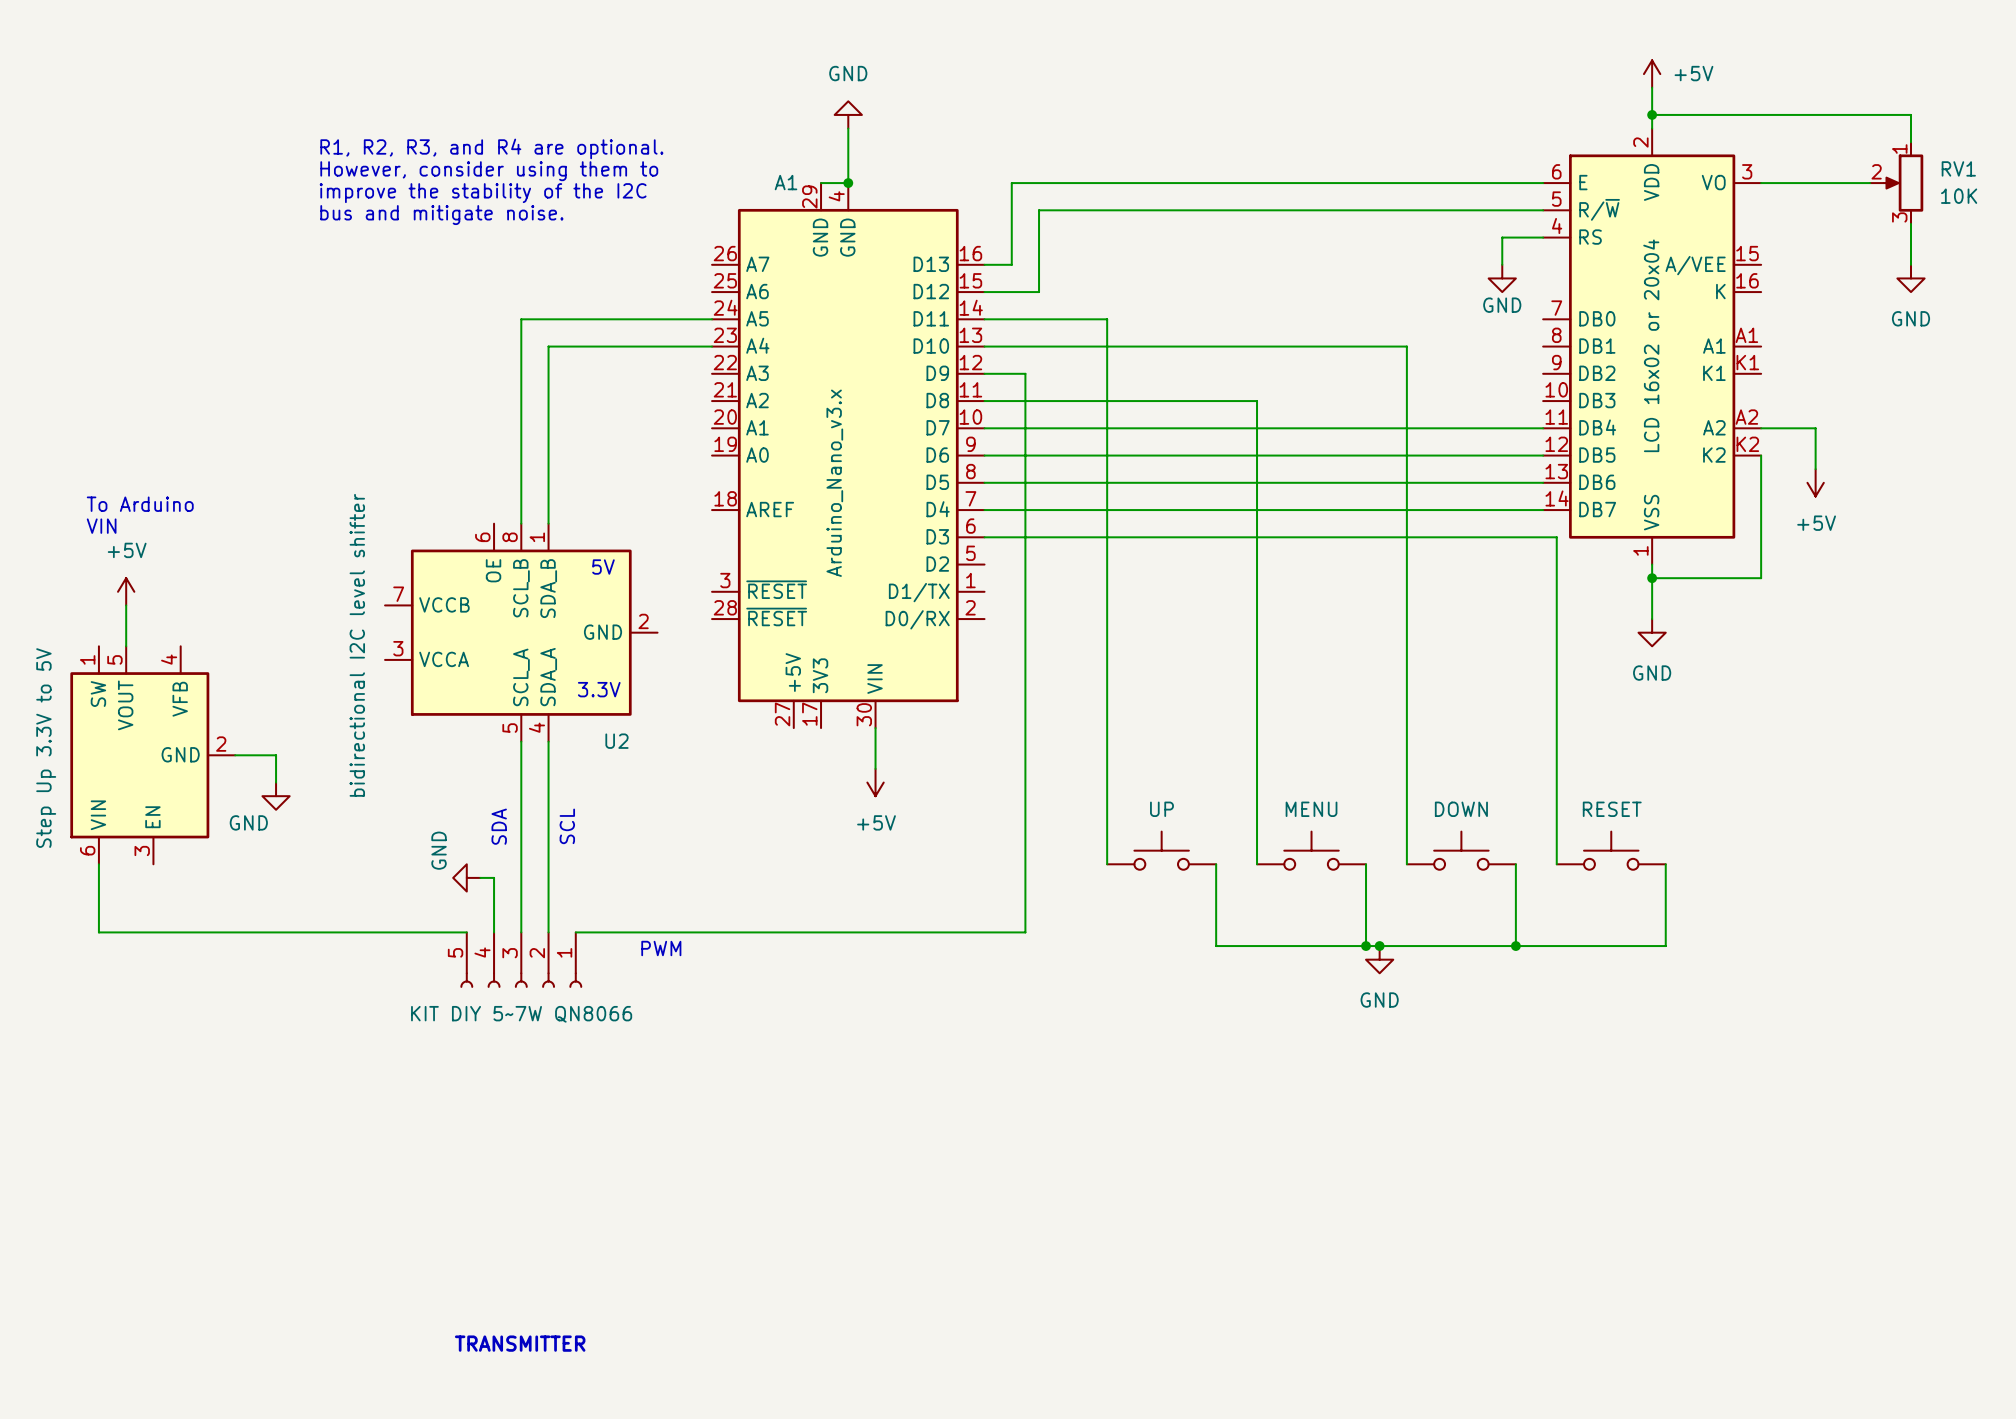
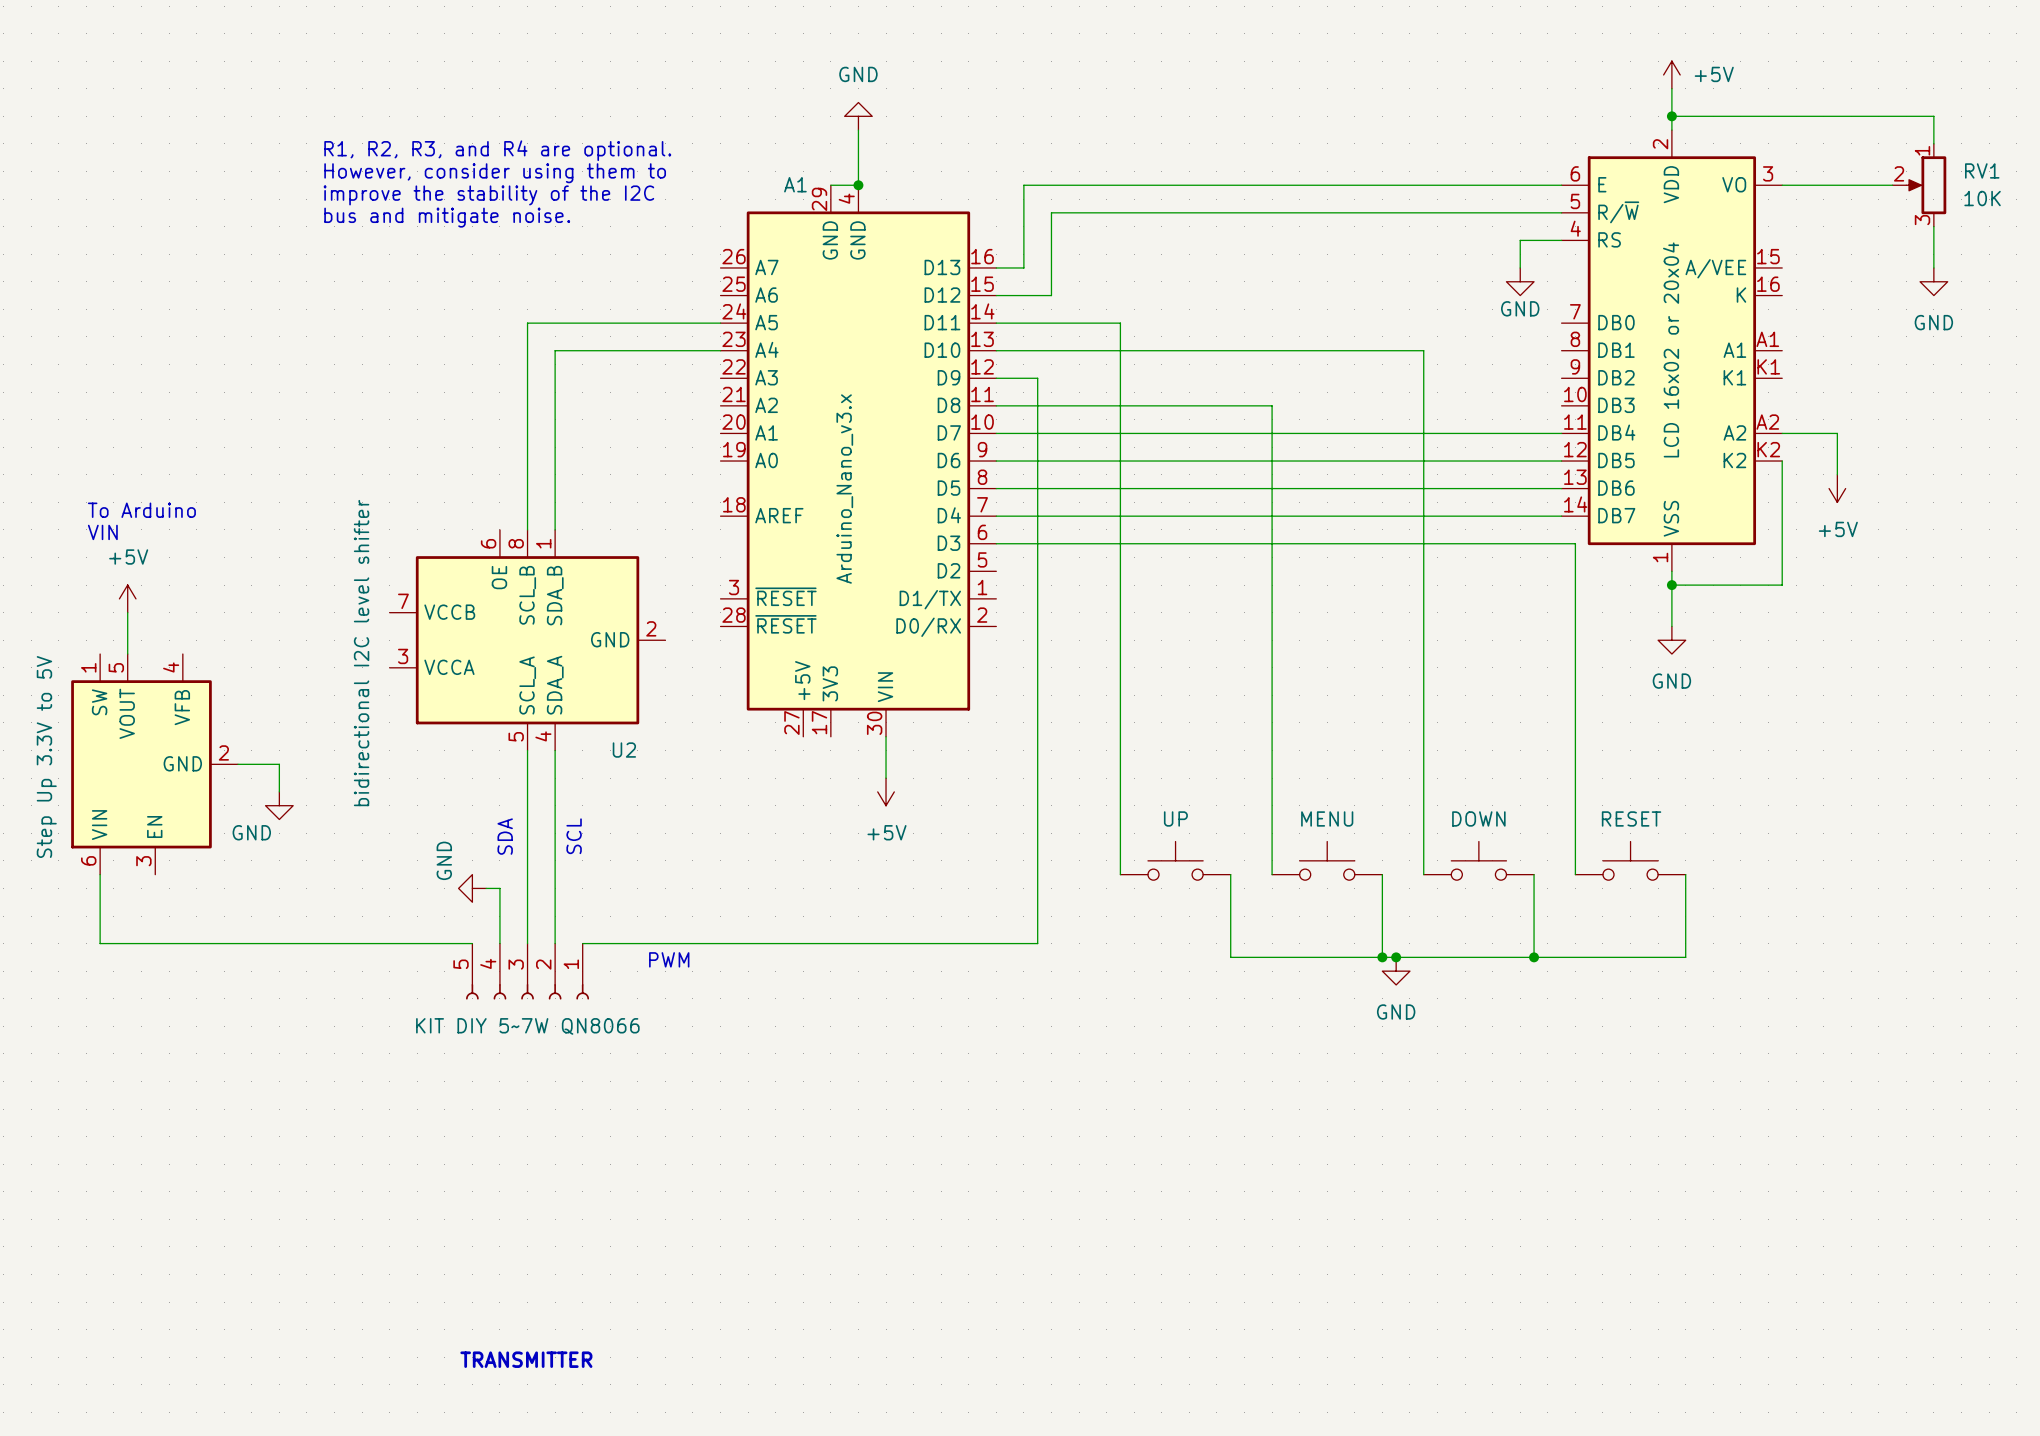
text: 5V (603, 567) -> none
text: 3.3V (599, 689) -> none

